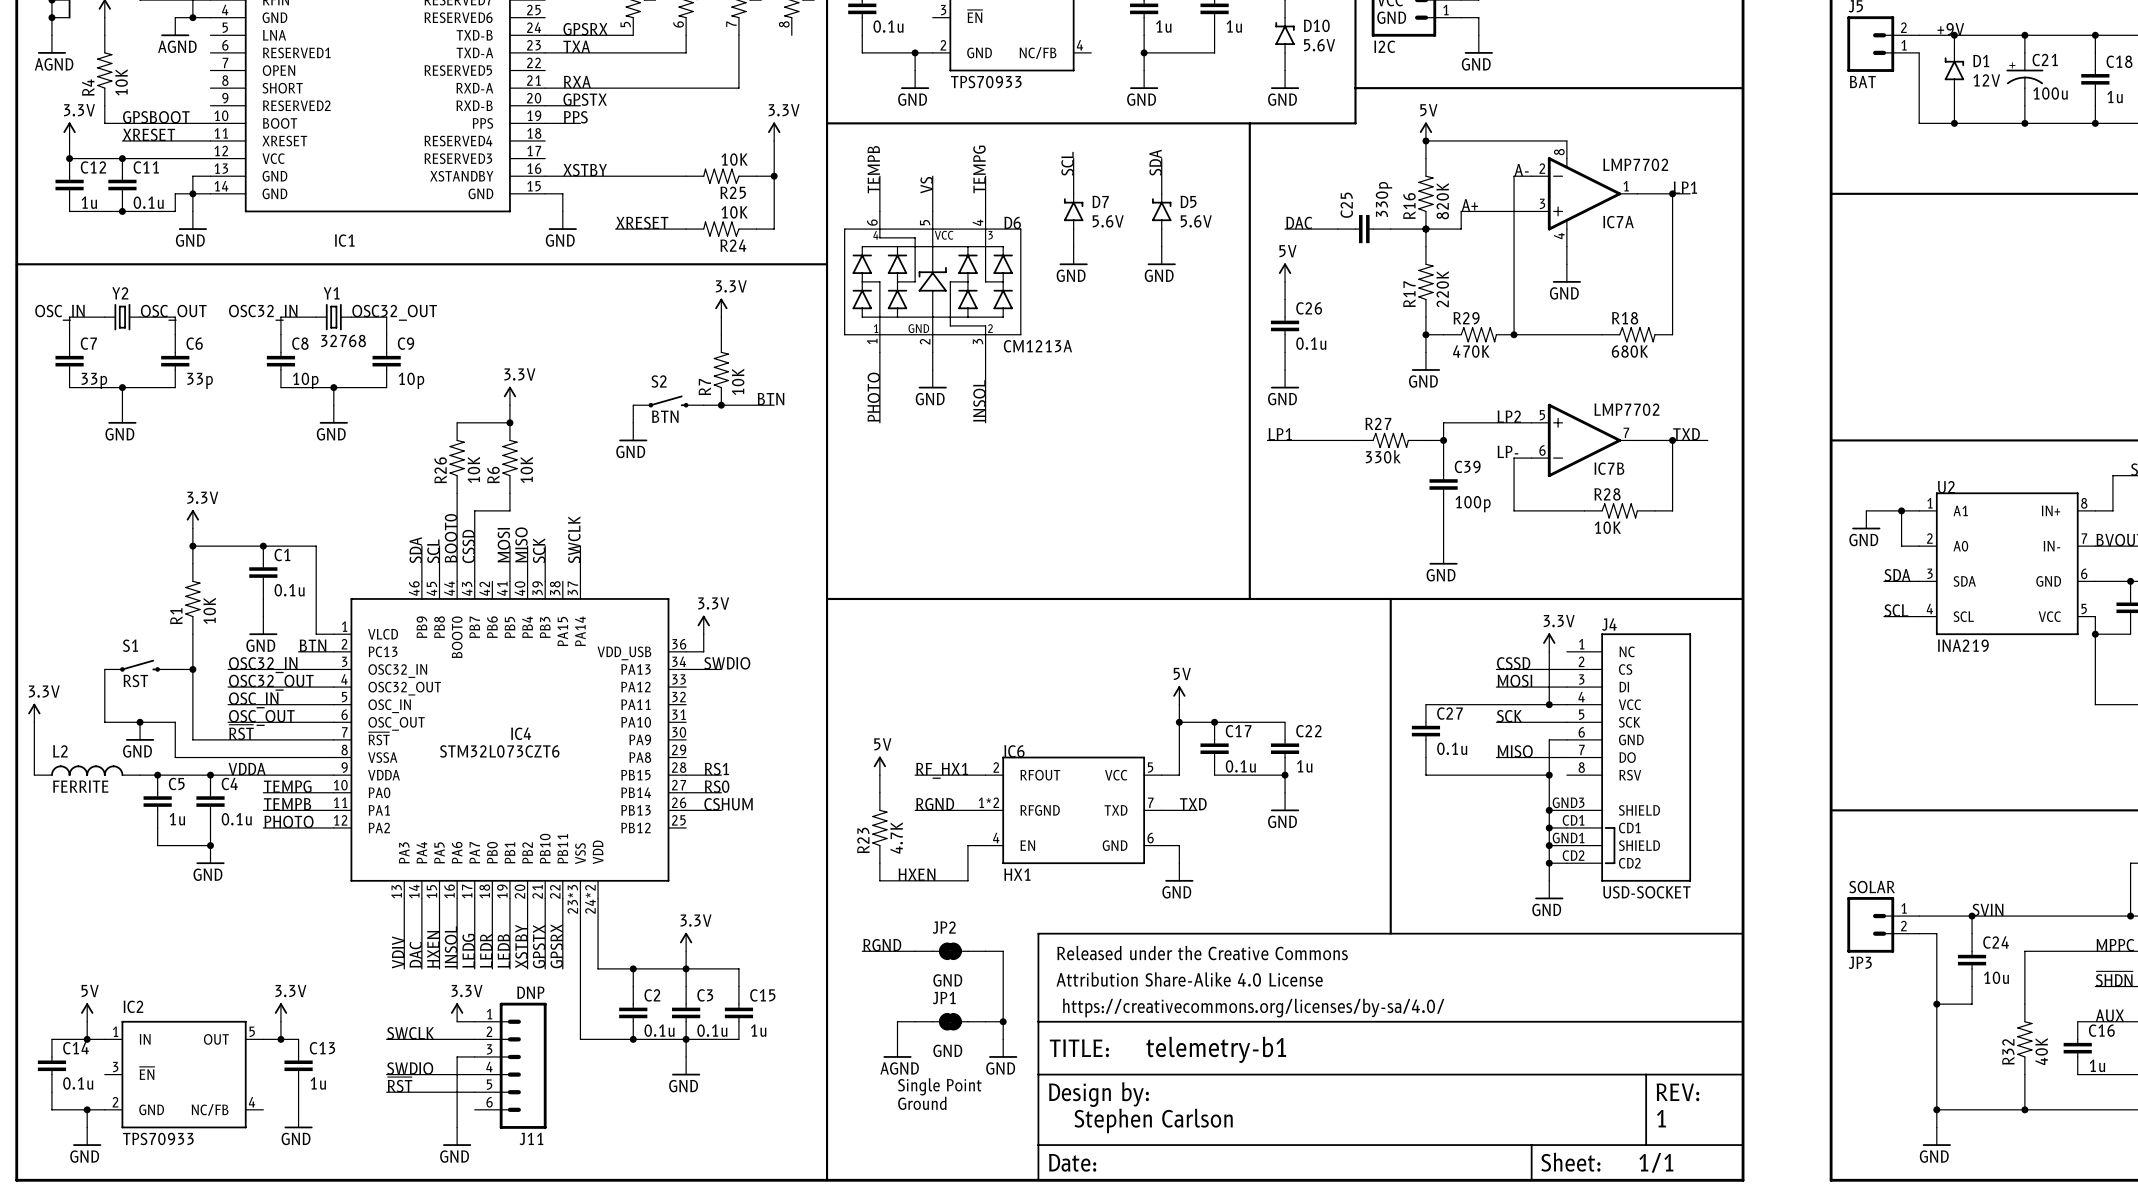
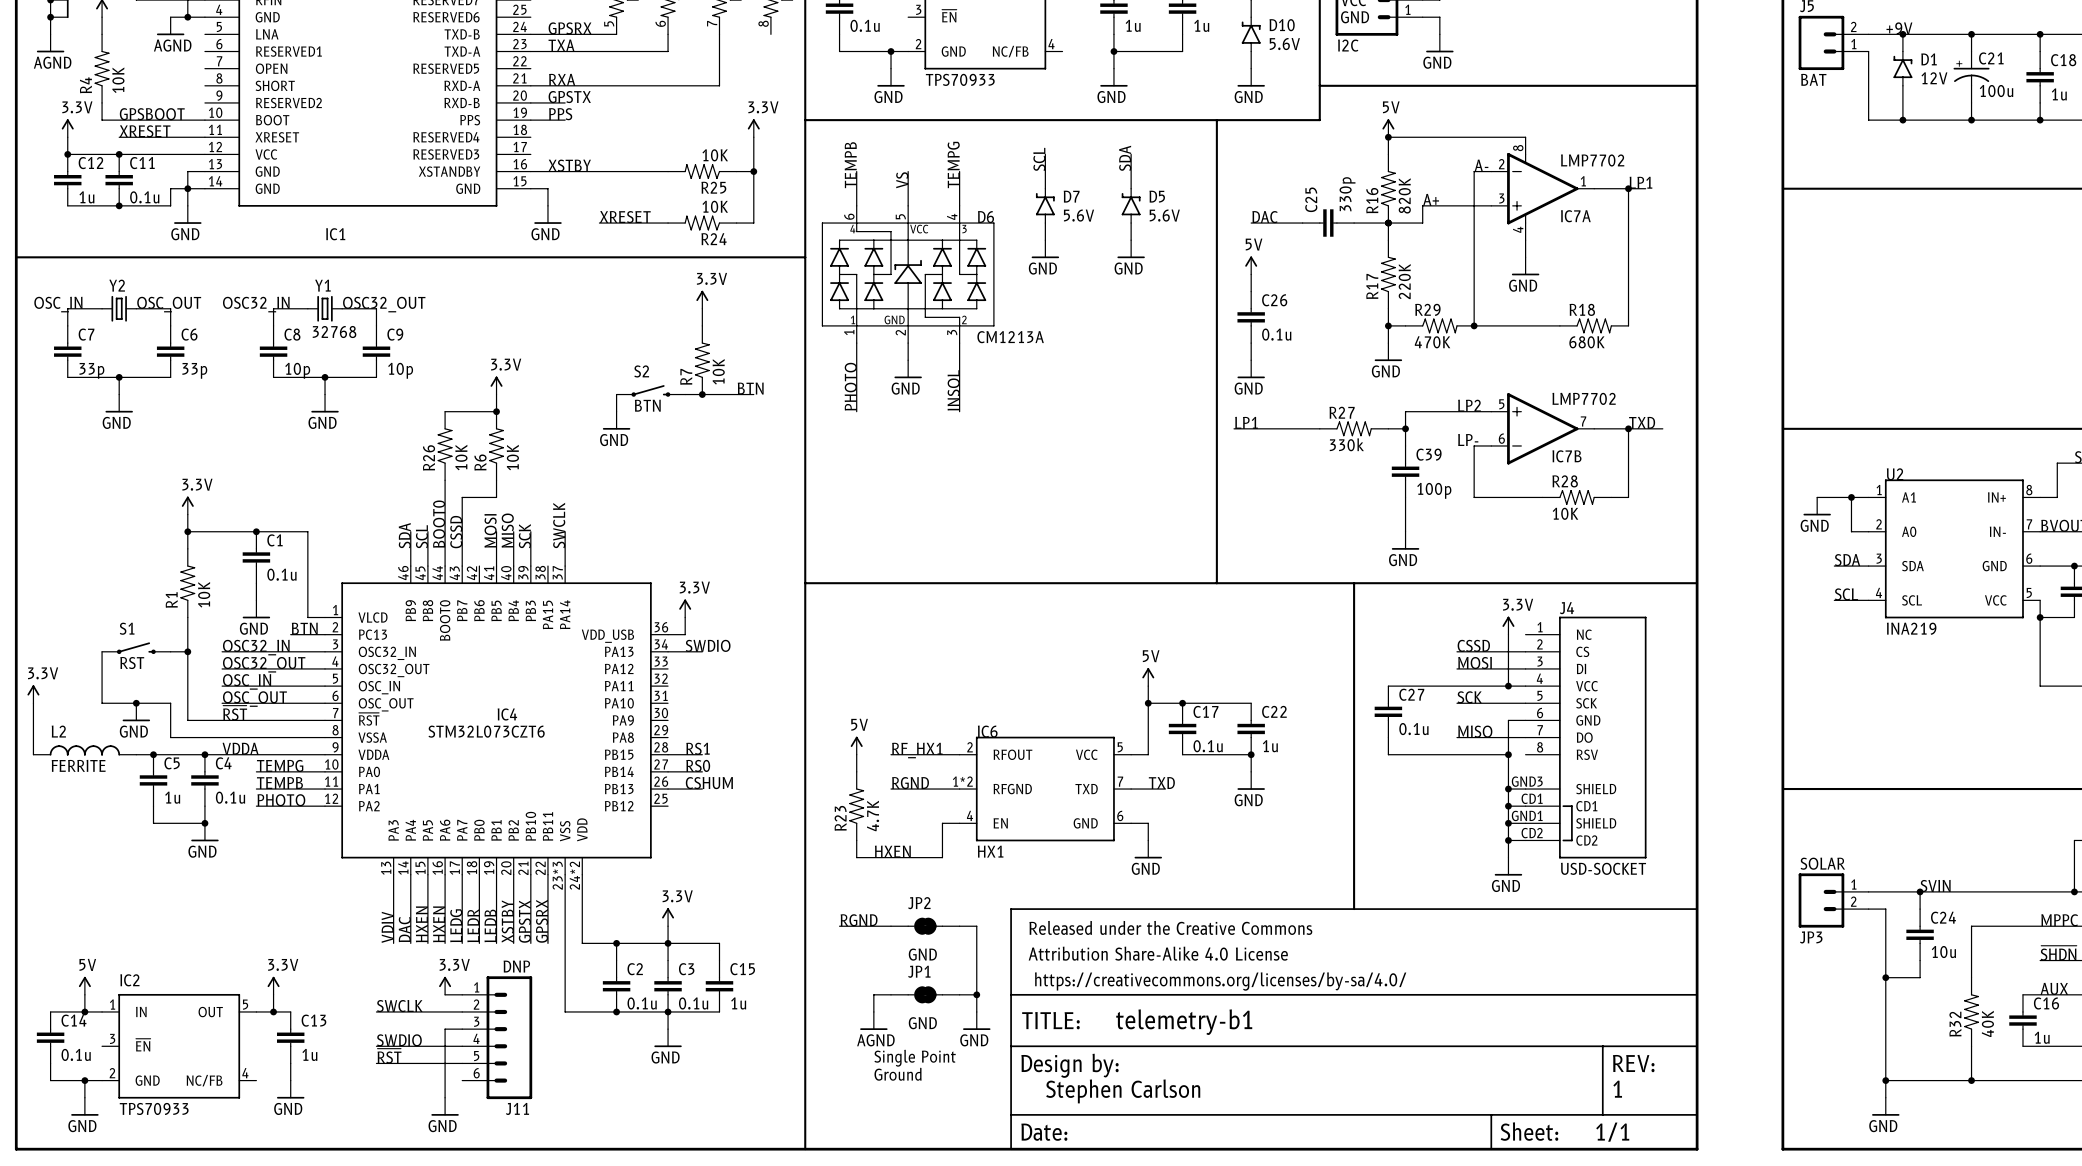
label: INSOL (451, 947) -> HXEN (439, 924)

